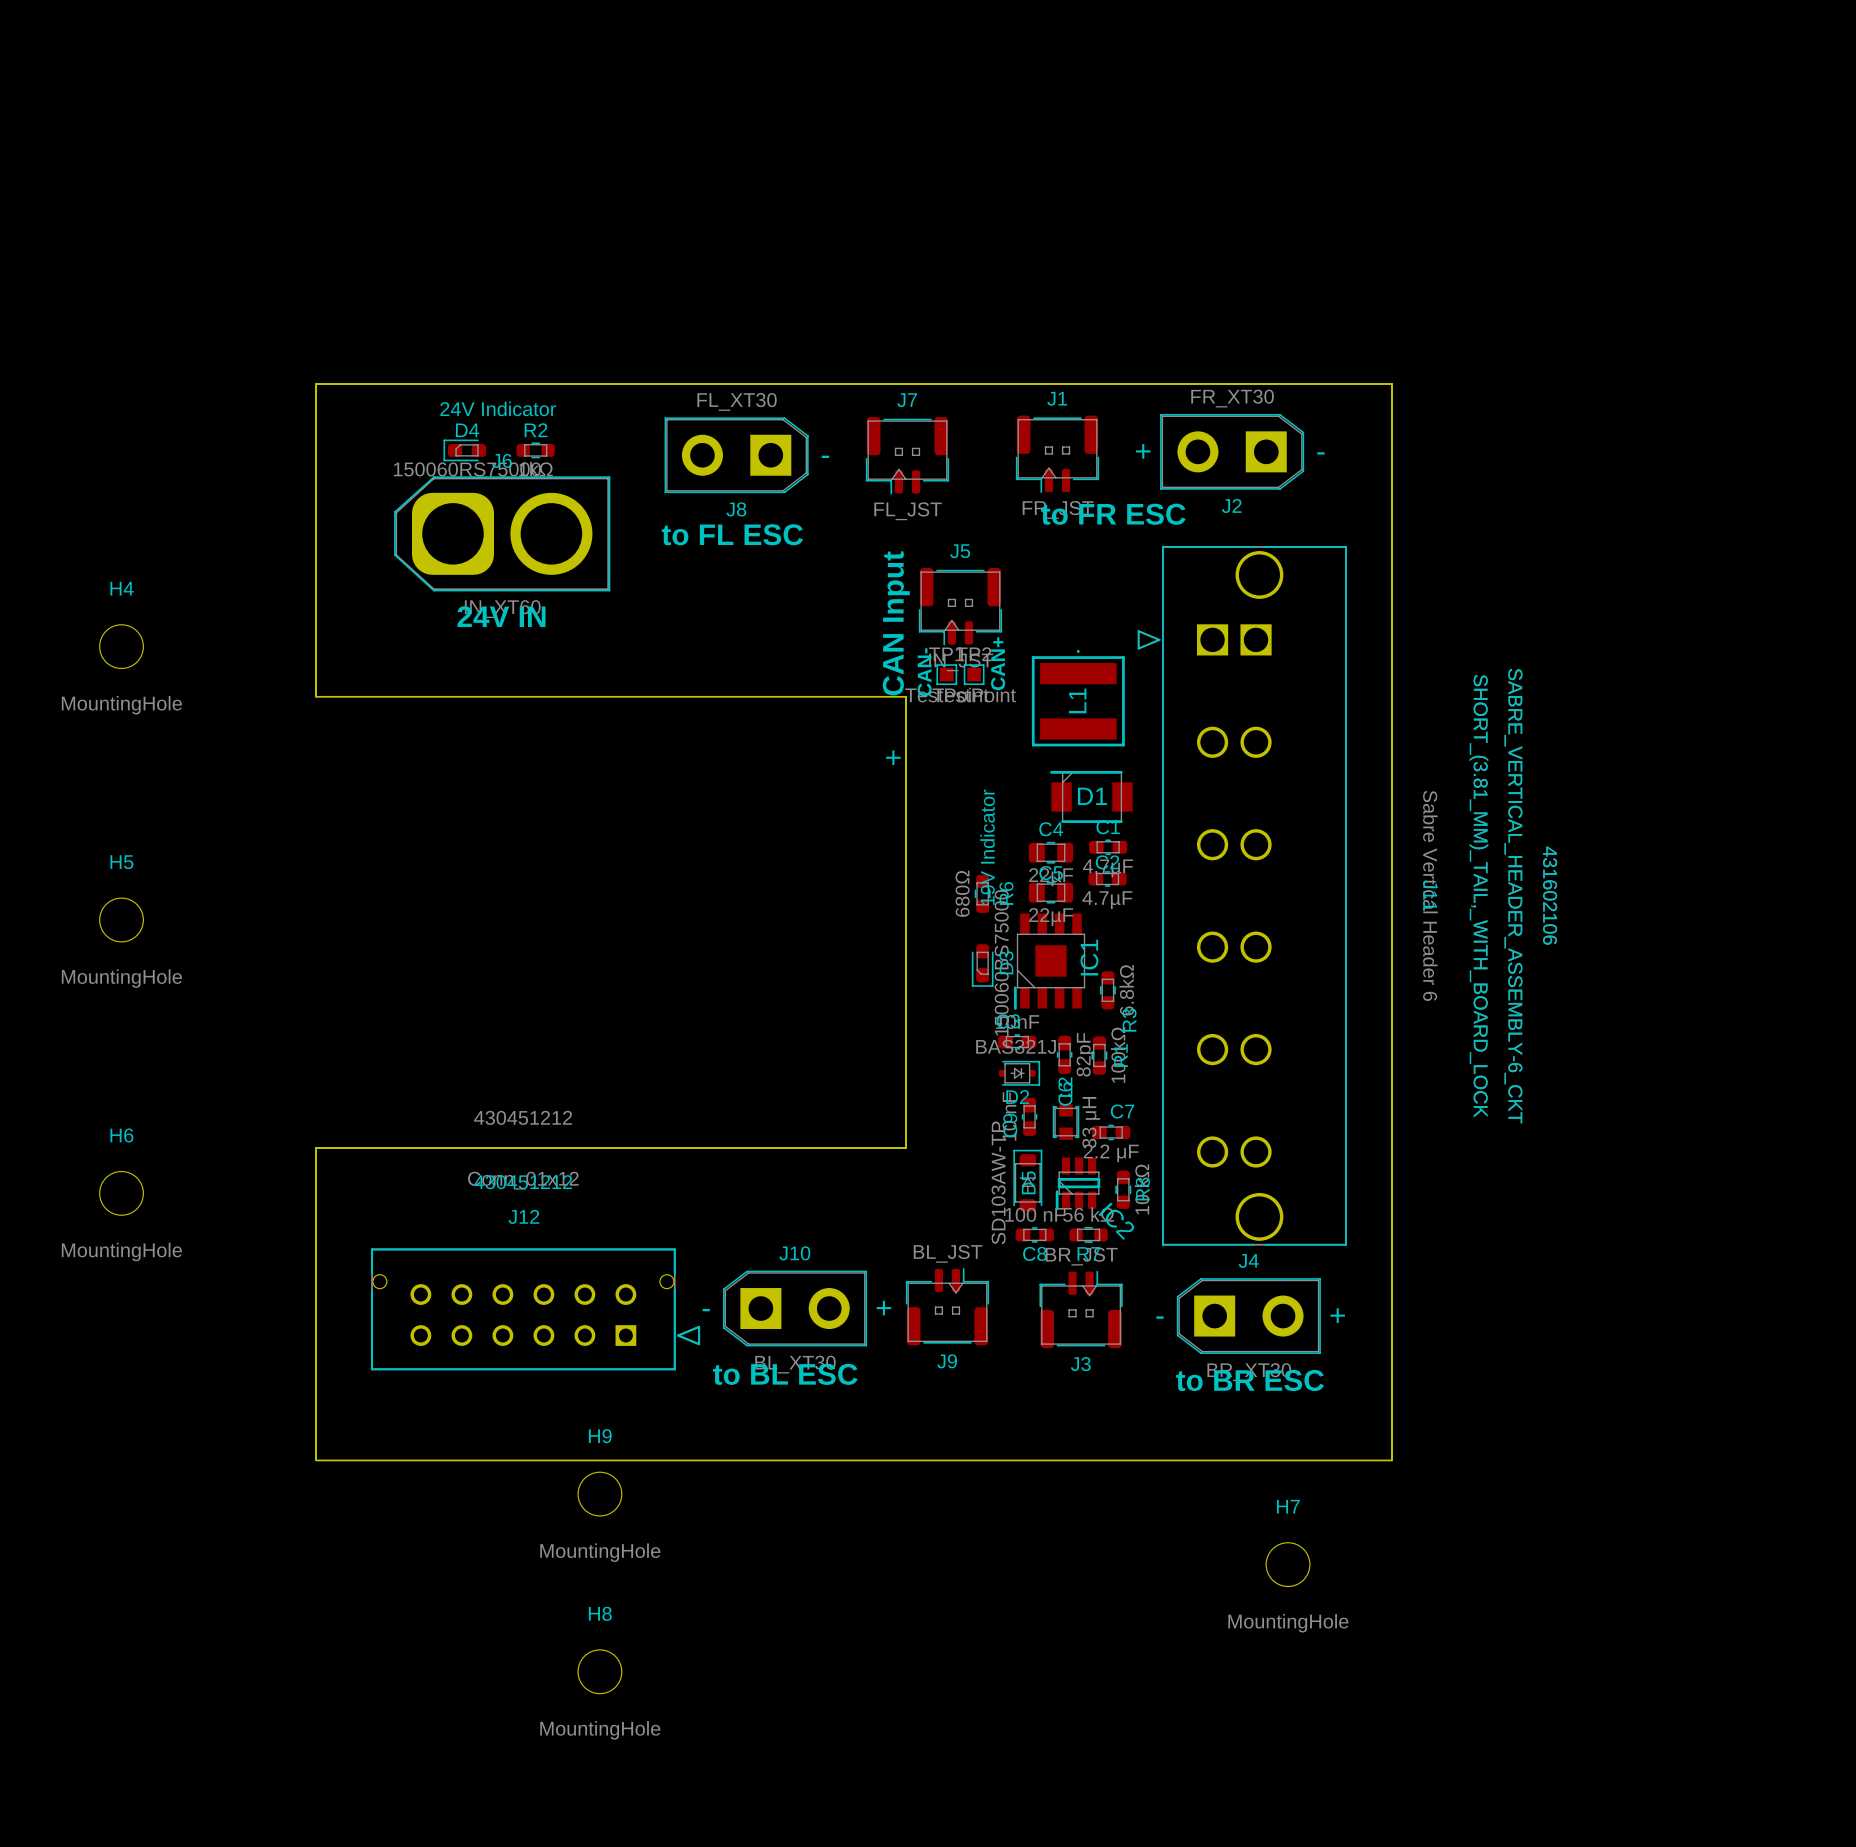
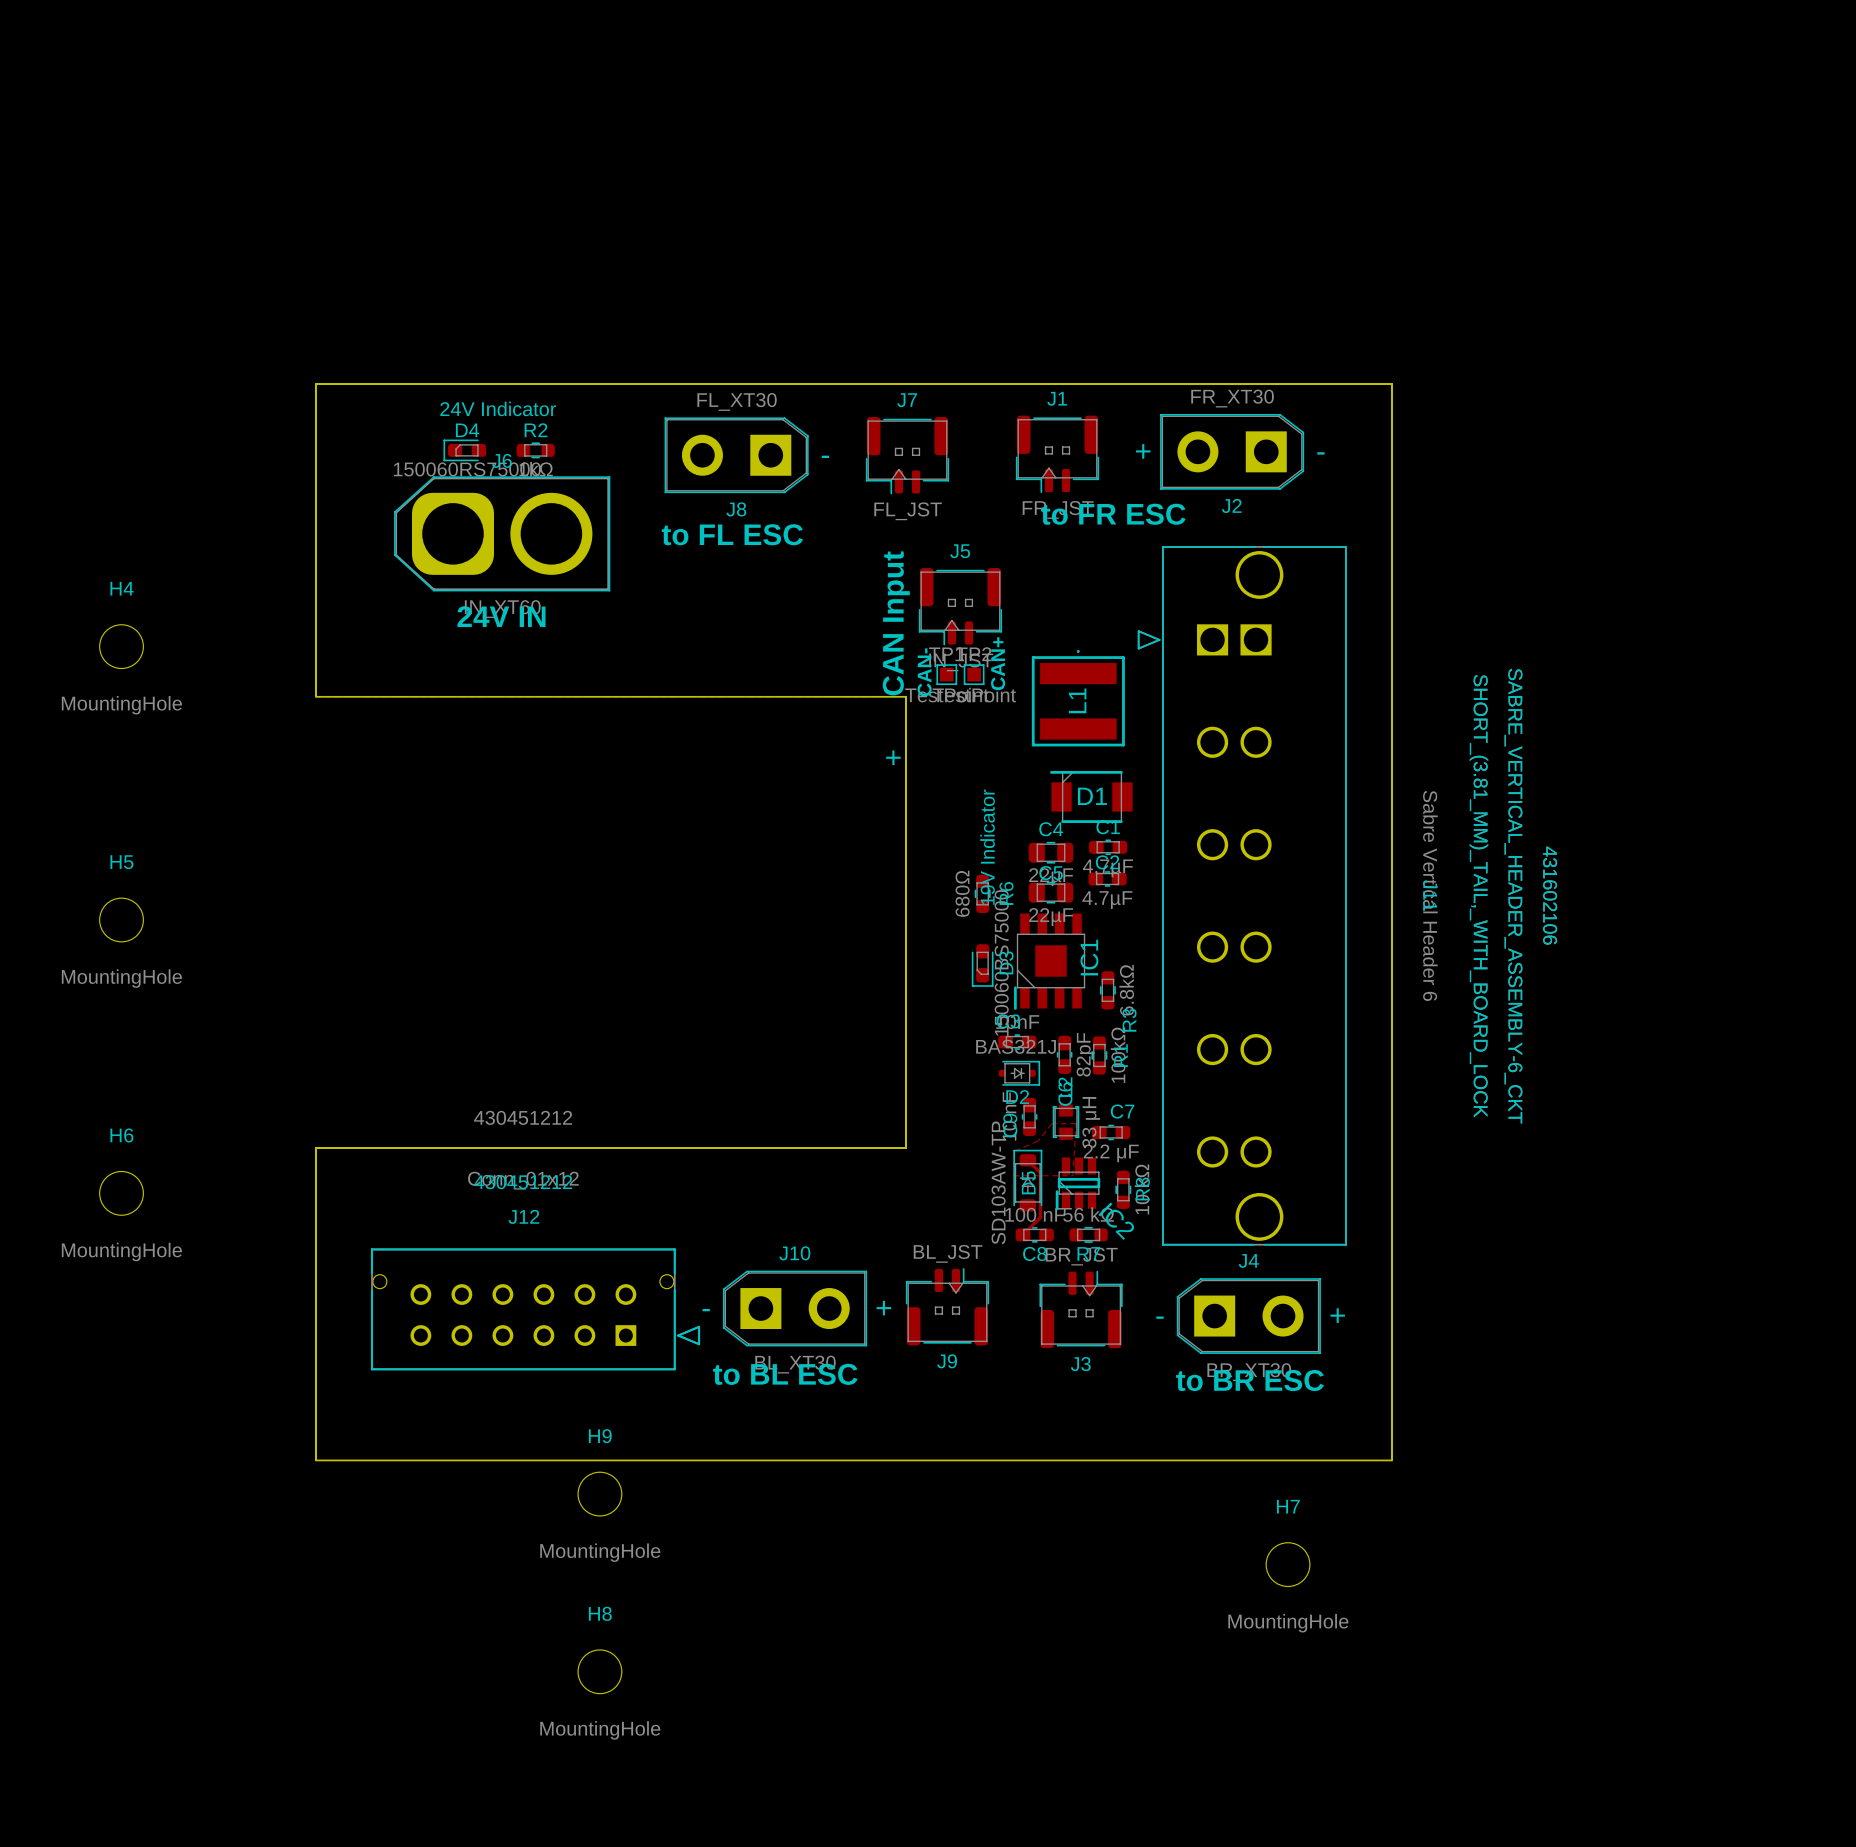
top zone outline: none -> (1051, 1123) (1076, 1123) (1072, 1175) (1013, 1175) (1013, 1151) (1038, 1141) (1051, 1123)
top track: none -> (1027, 1160) (1040, 1172) (1040, 1217) (1022, 1234)

